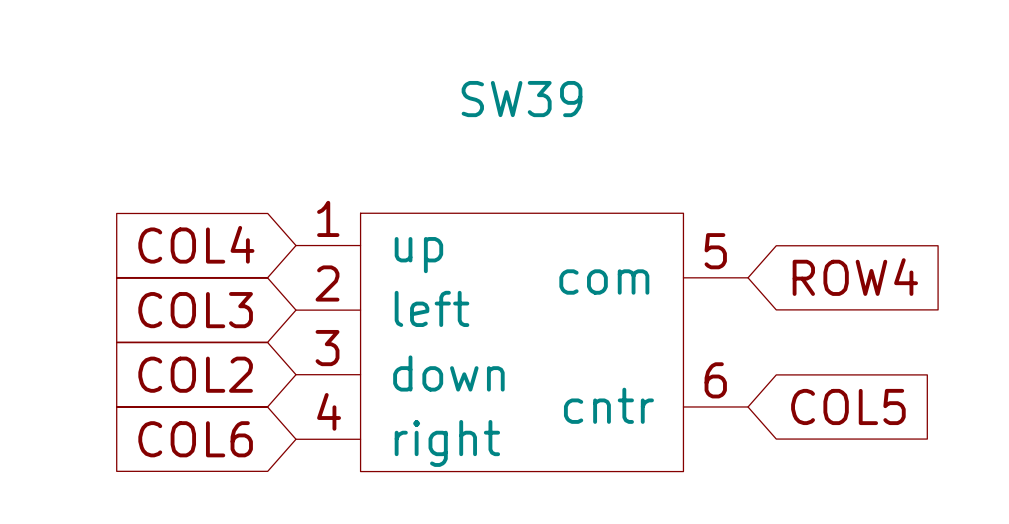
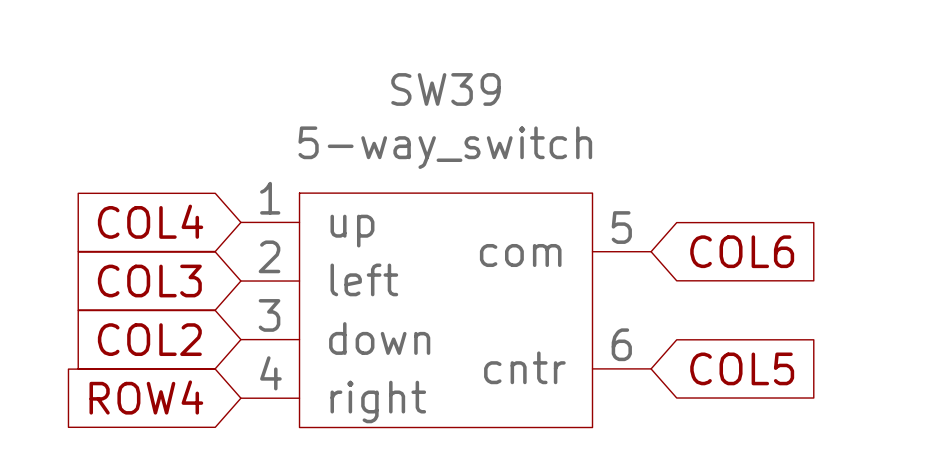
SW39 value: none -> 5-way_switch (445, 147)
global label: ROW4 (855, 277) -> COL6 (742, 251)
global label: COL6 (195, 439) -> ROW4 (146, 397)

